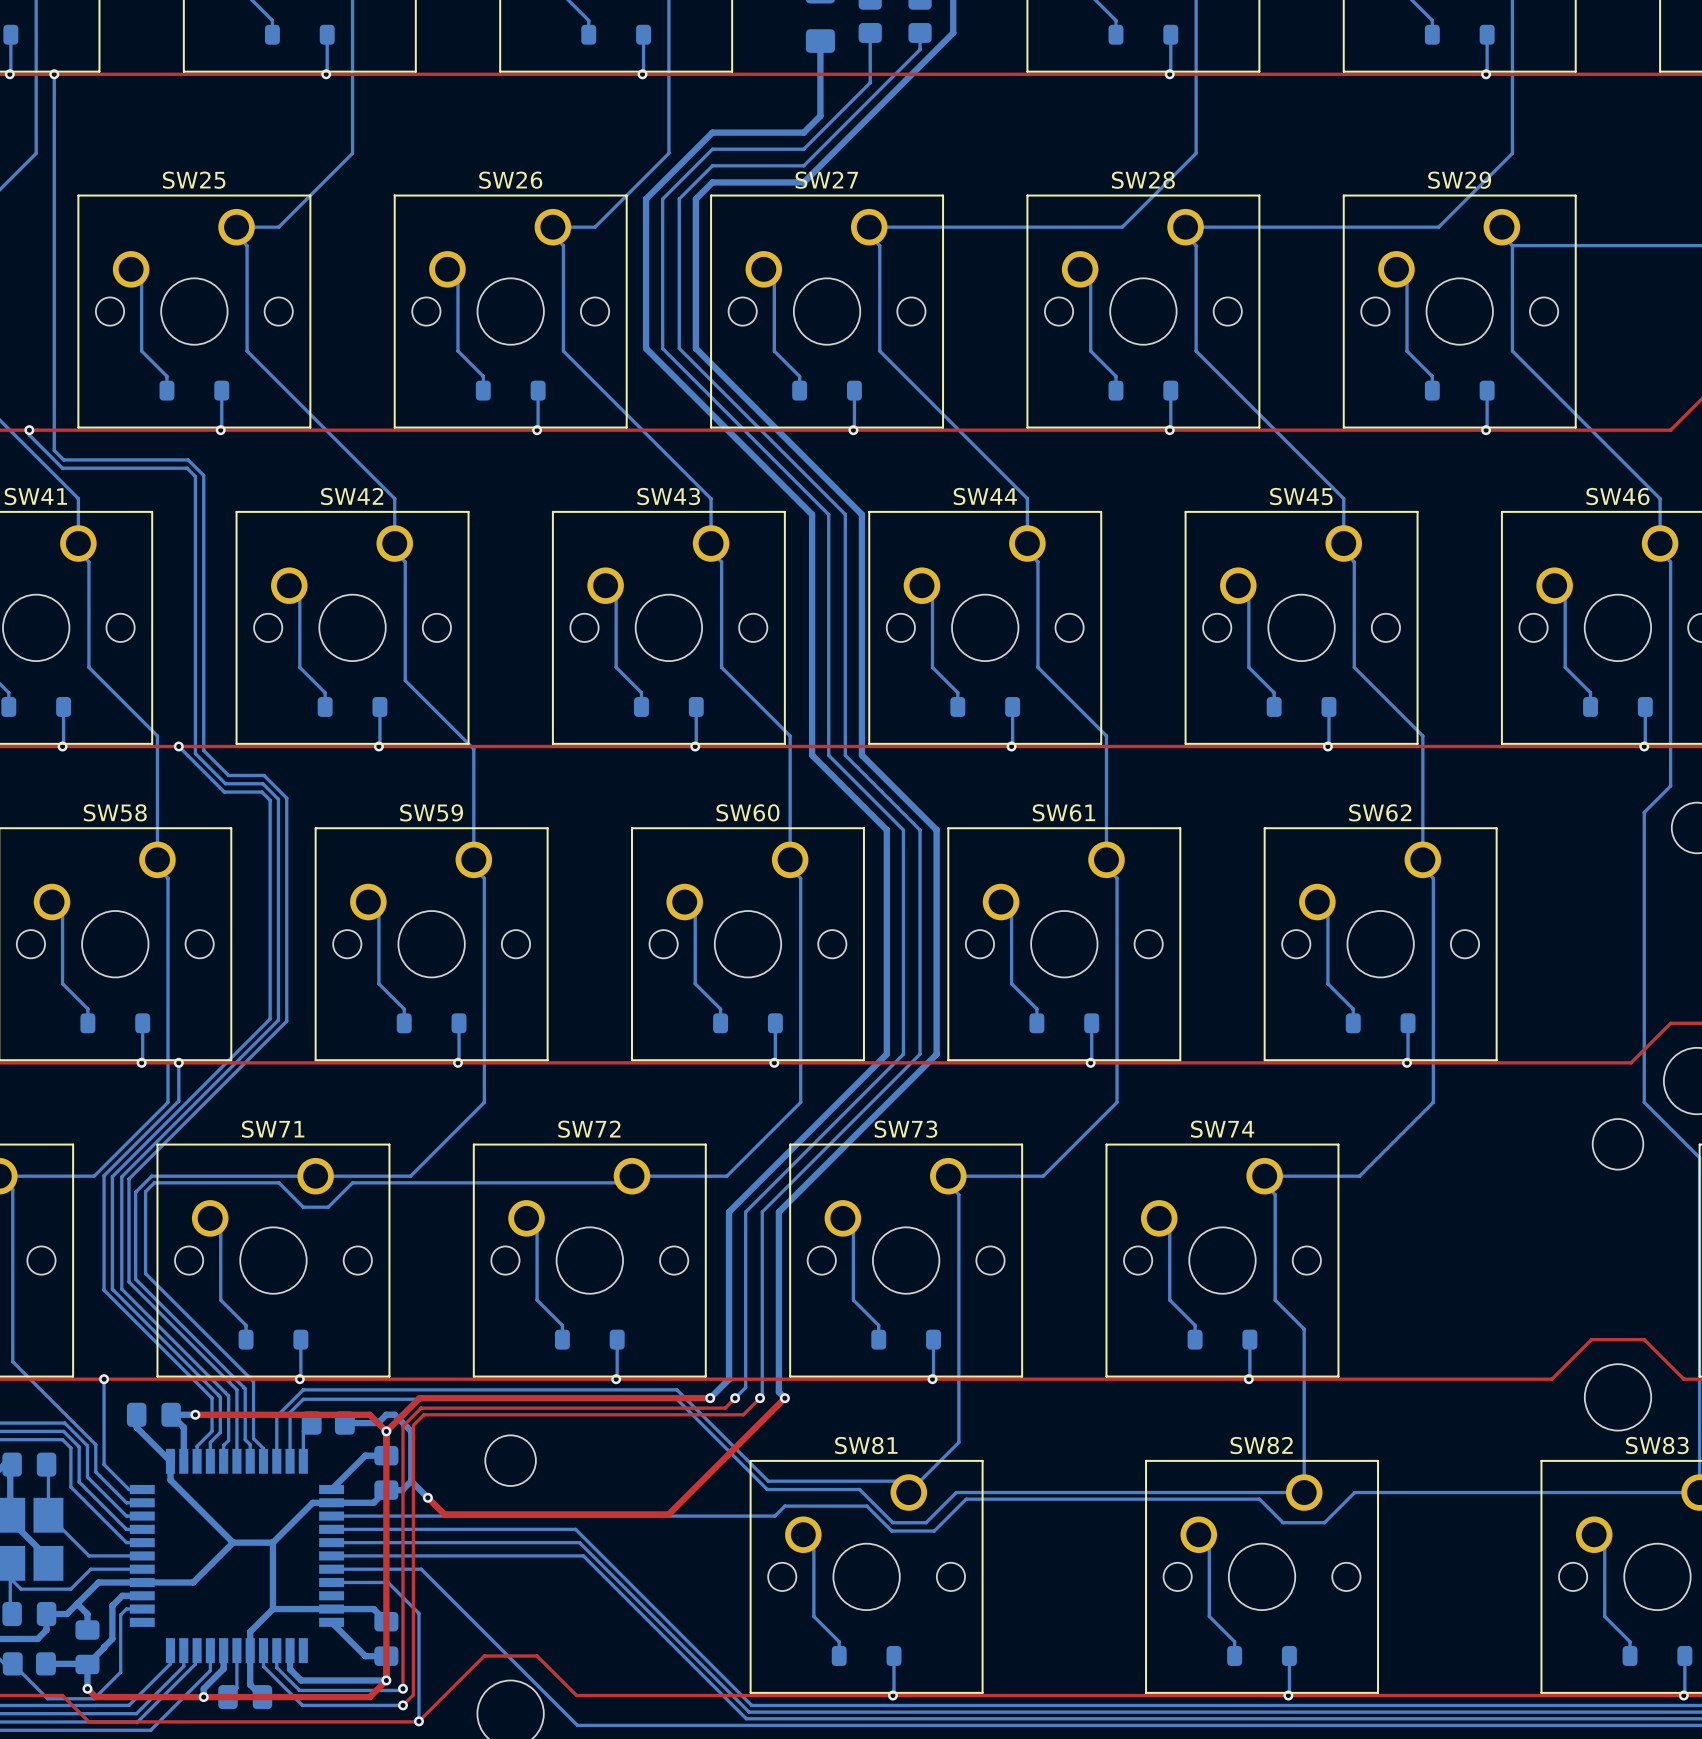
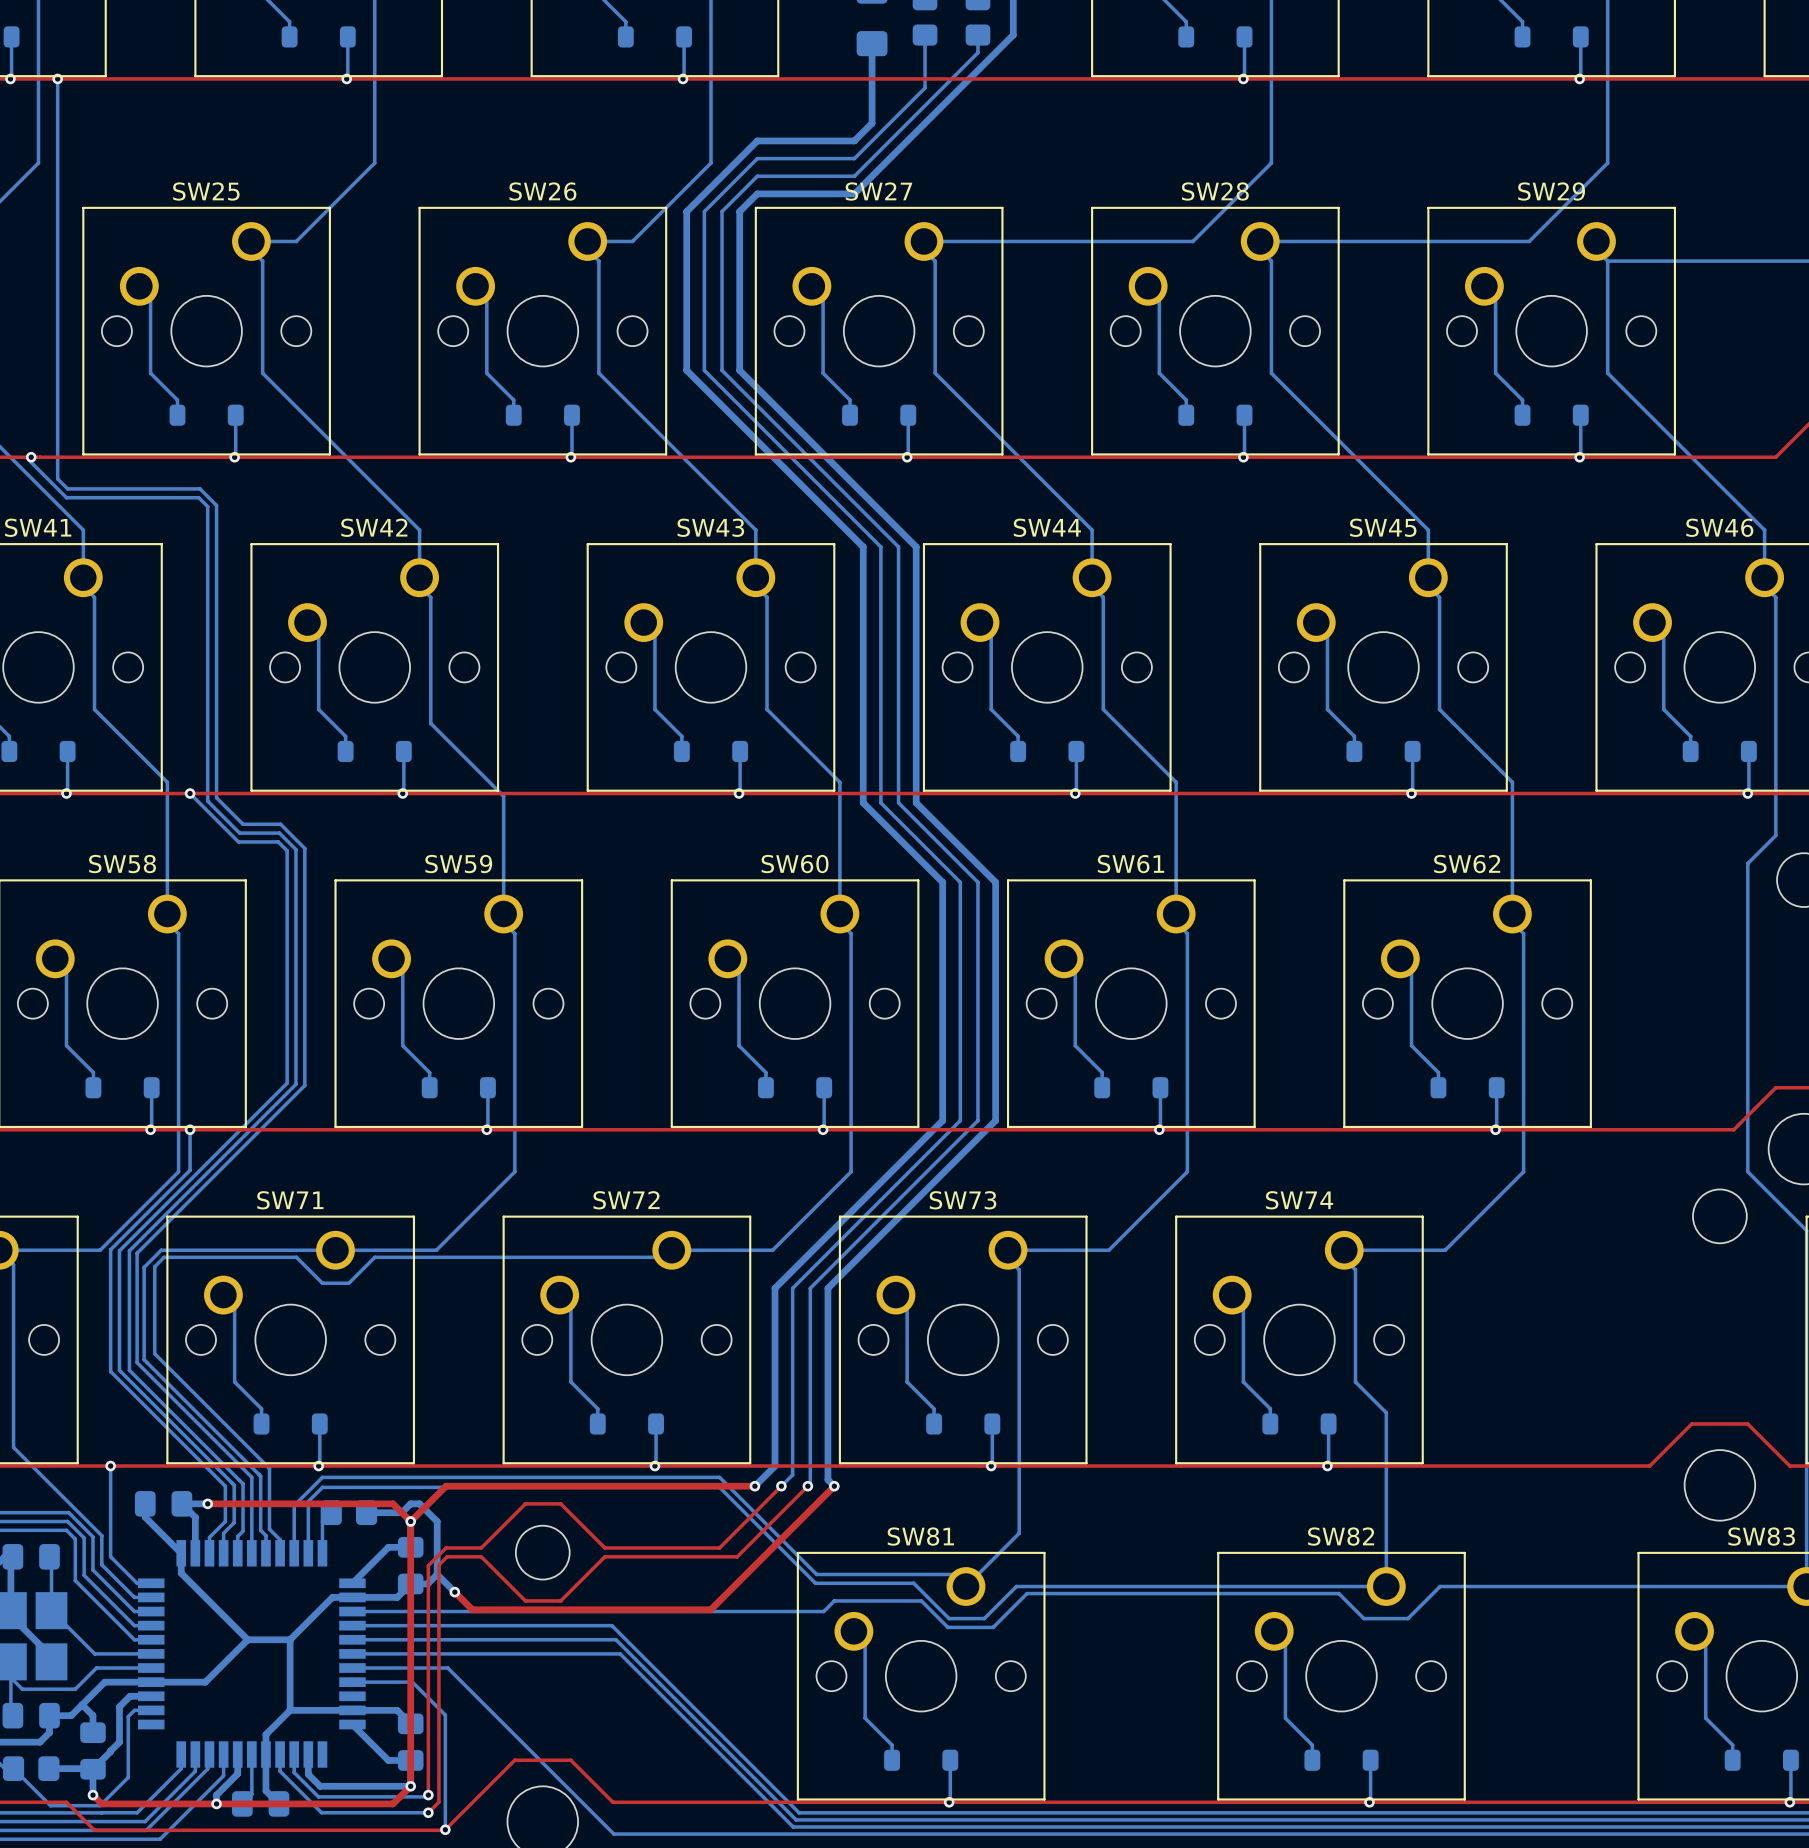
top track: (725, 1408) (421, 1408) (402, 1426) (402, 1472) -> none
top track: (494, 1414) (423, 1414) (413, 1425) (412, 1695) -> (525, 1503) (481, 1547) (446, 1547) (428, 1565)
top track: (527, 1414) (743, 1414) -> (560, 1503) (604, 1547) (719, 1547) (770, 1496)
top track: none -> (790, 1503) (737, 1556) (604, 1556) (560, 1600) (525, 1600) (481, 1556) (447, 1556) (438, 1565) (438, 1802)

